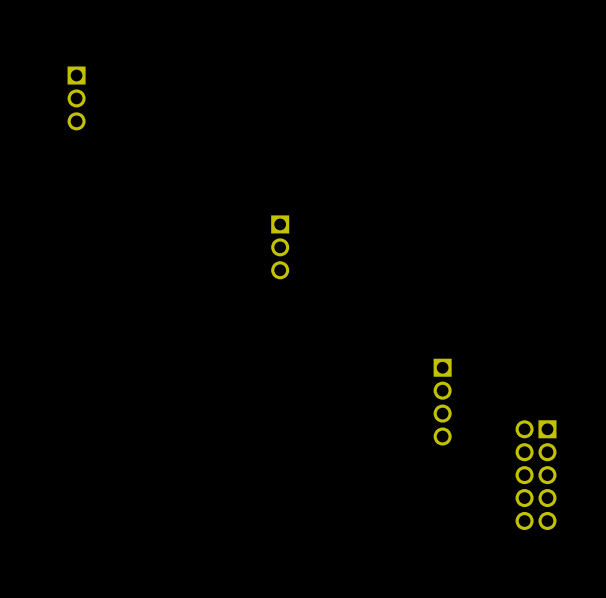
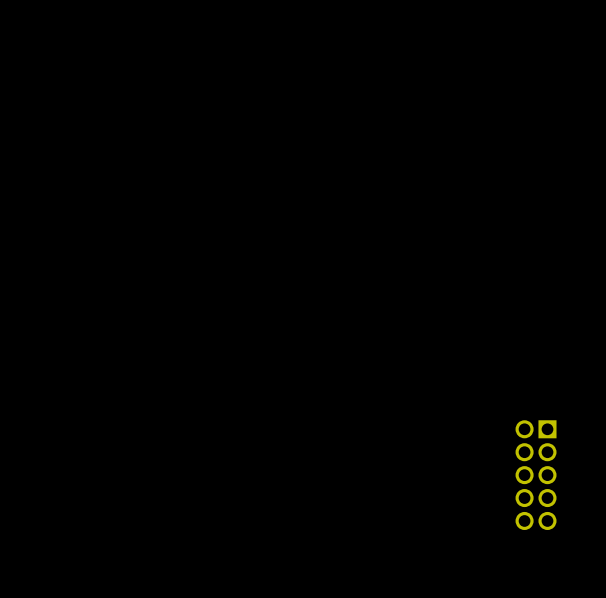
part: (76, 98) -> none
part: (280, 247) -> none
part: (442, 402) -> none

